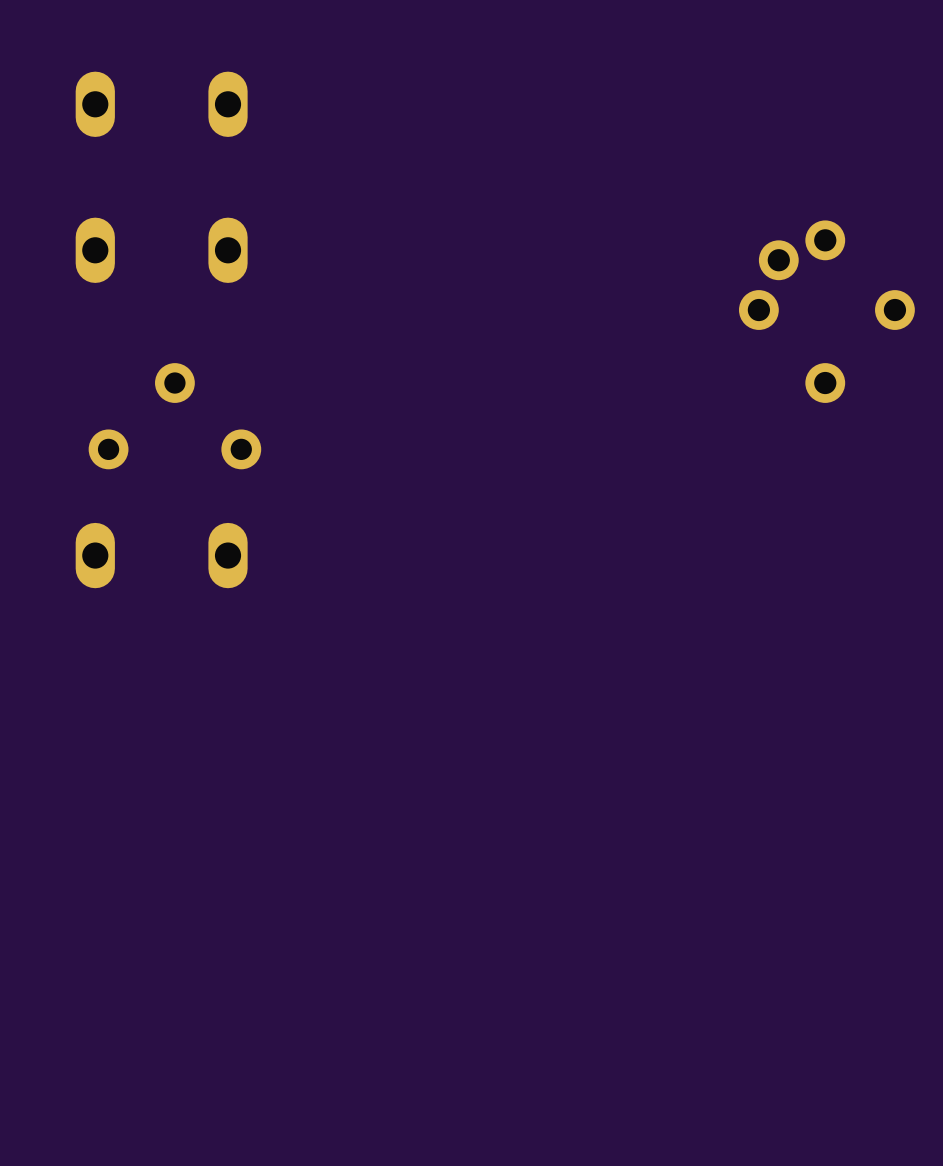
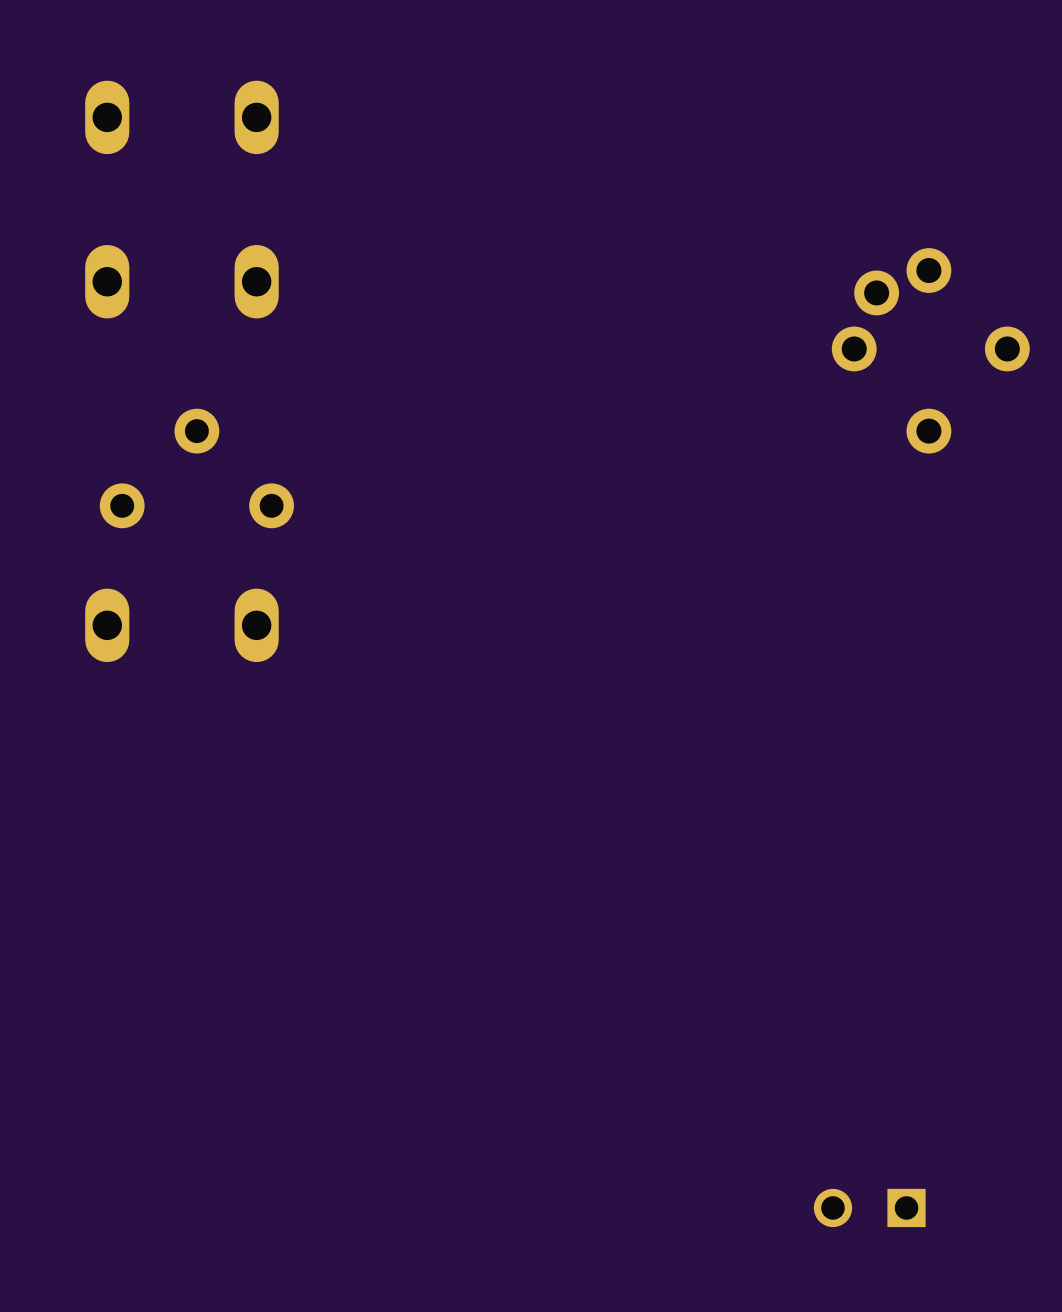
part: none -> (869, 1207)

